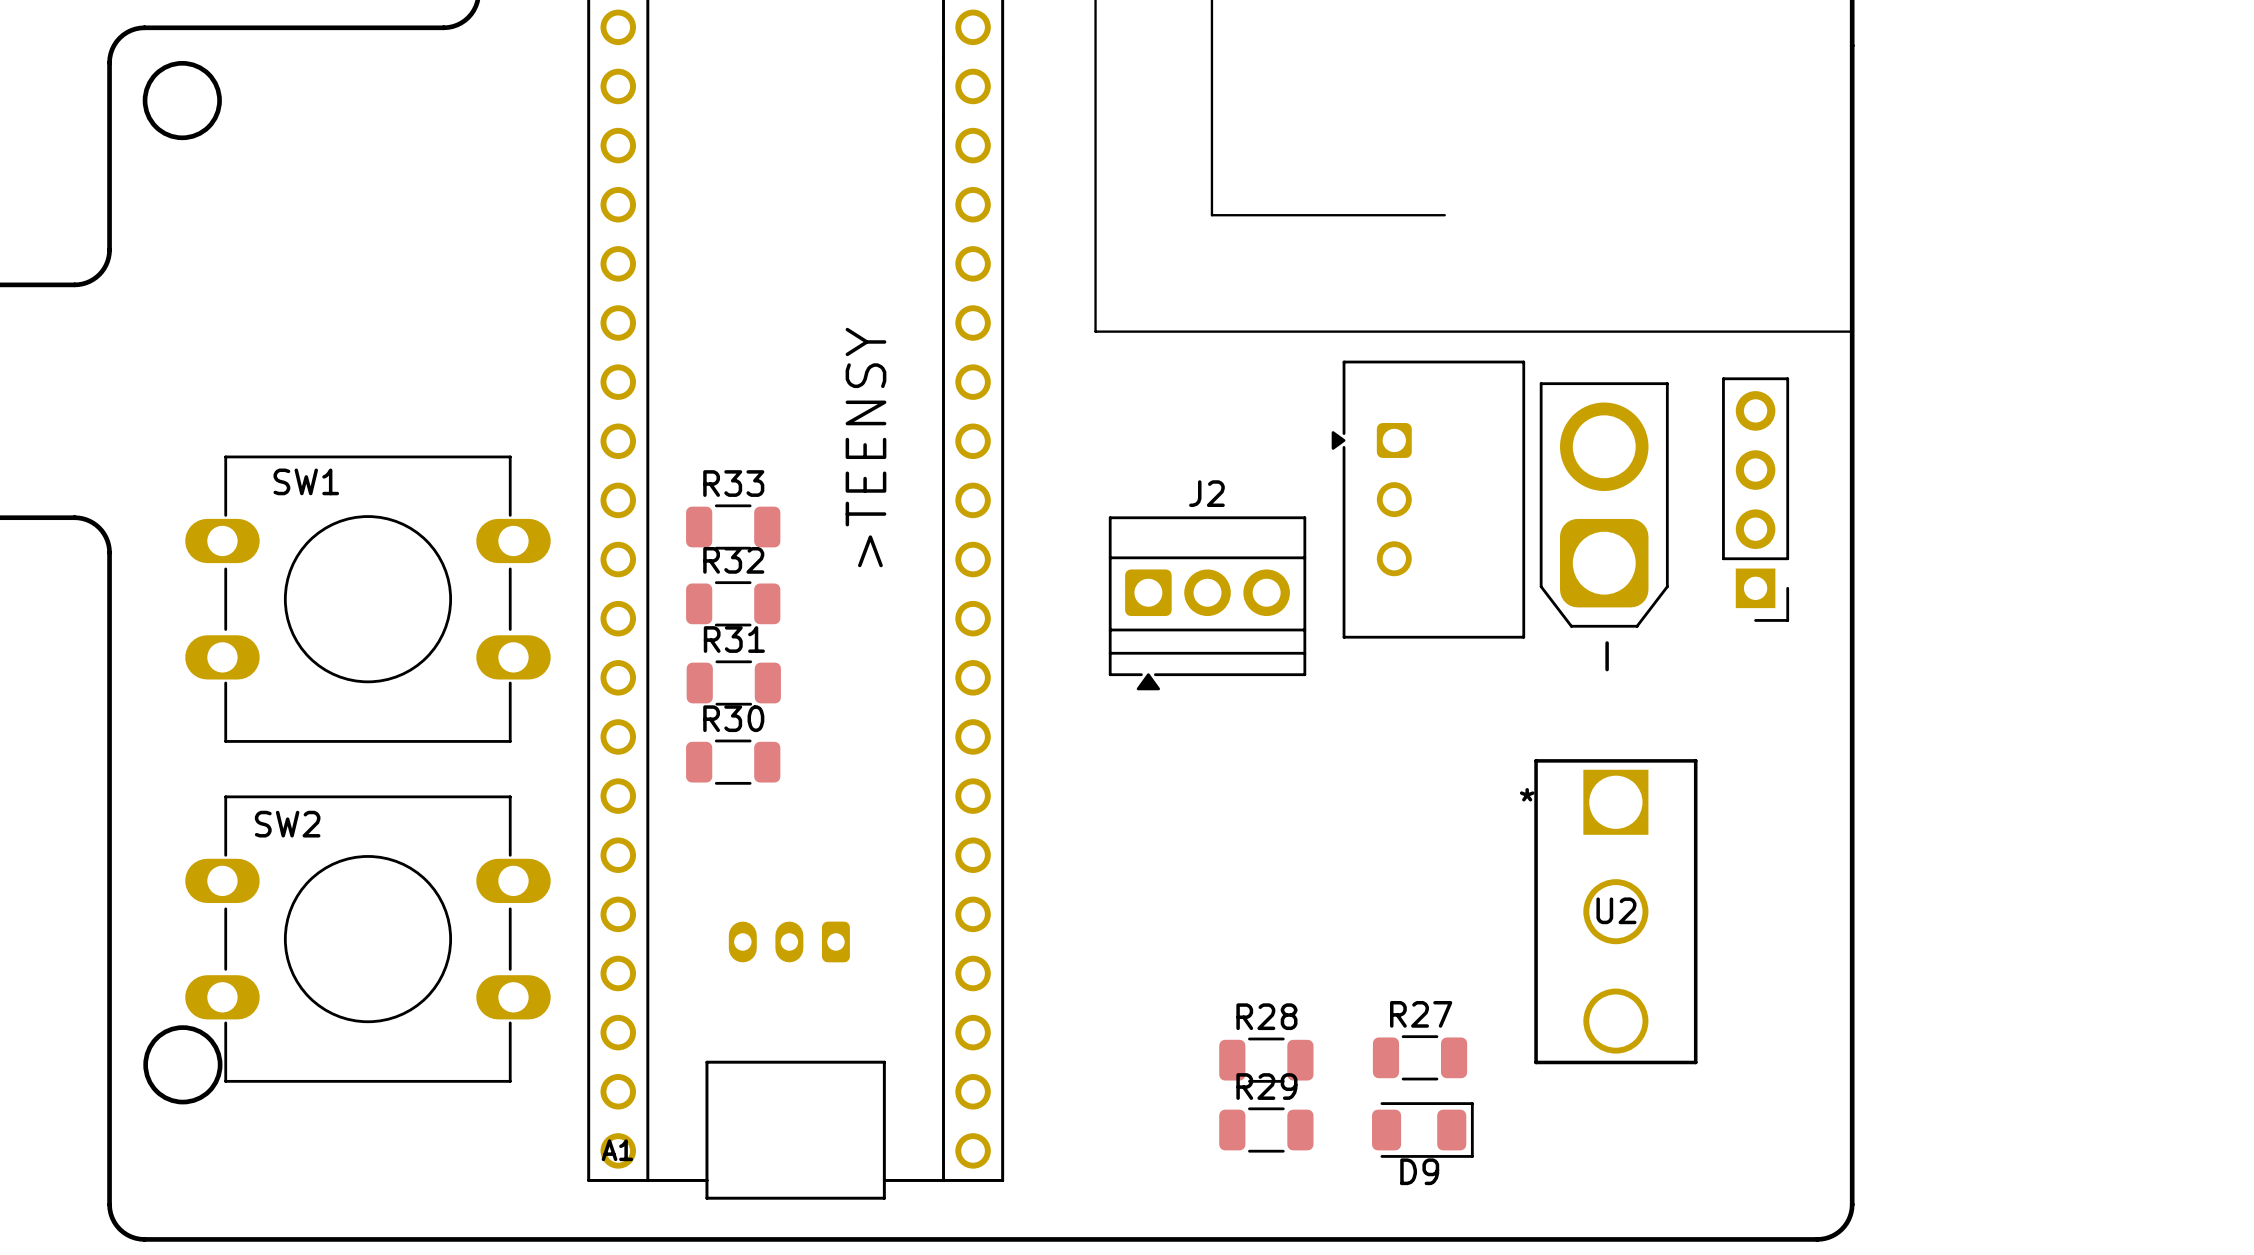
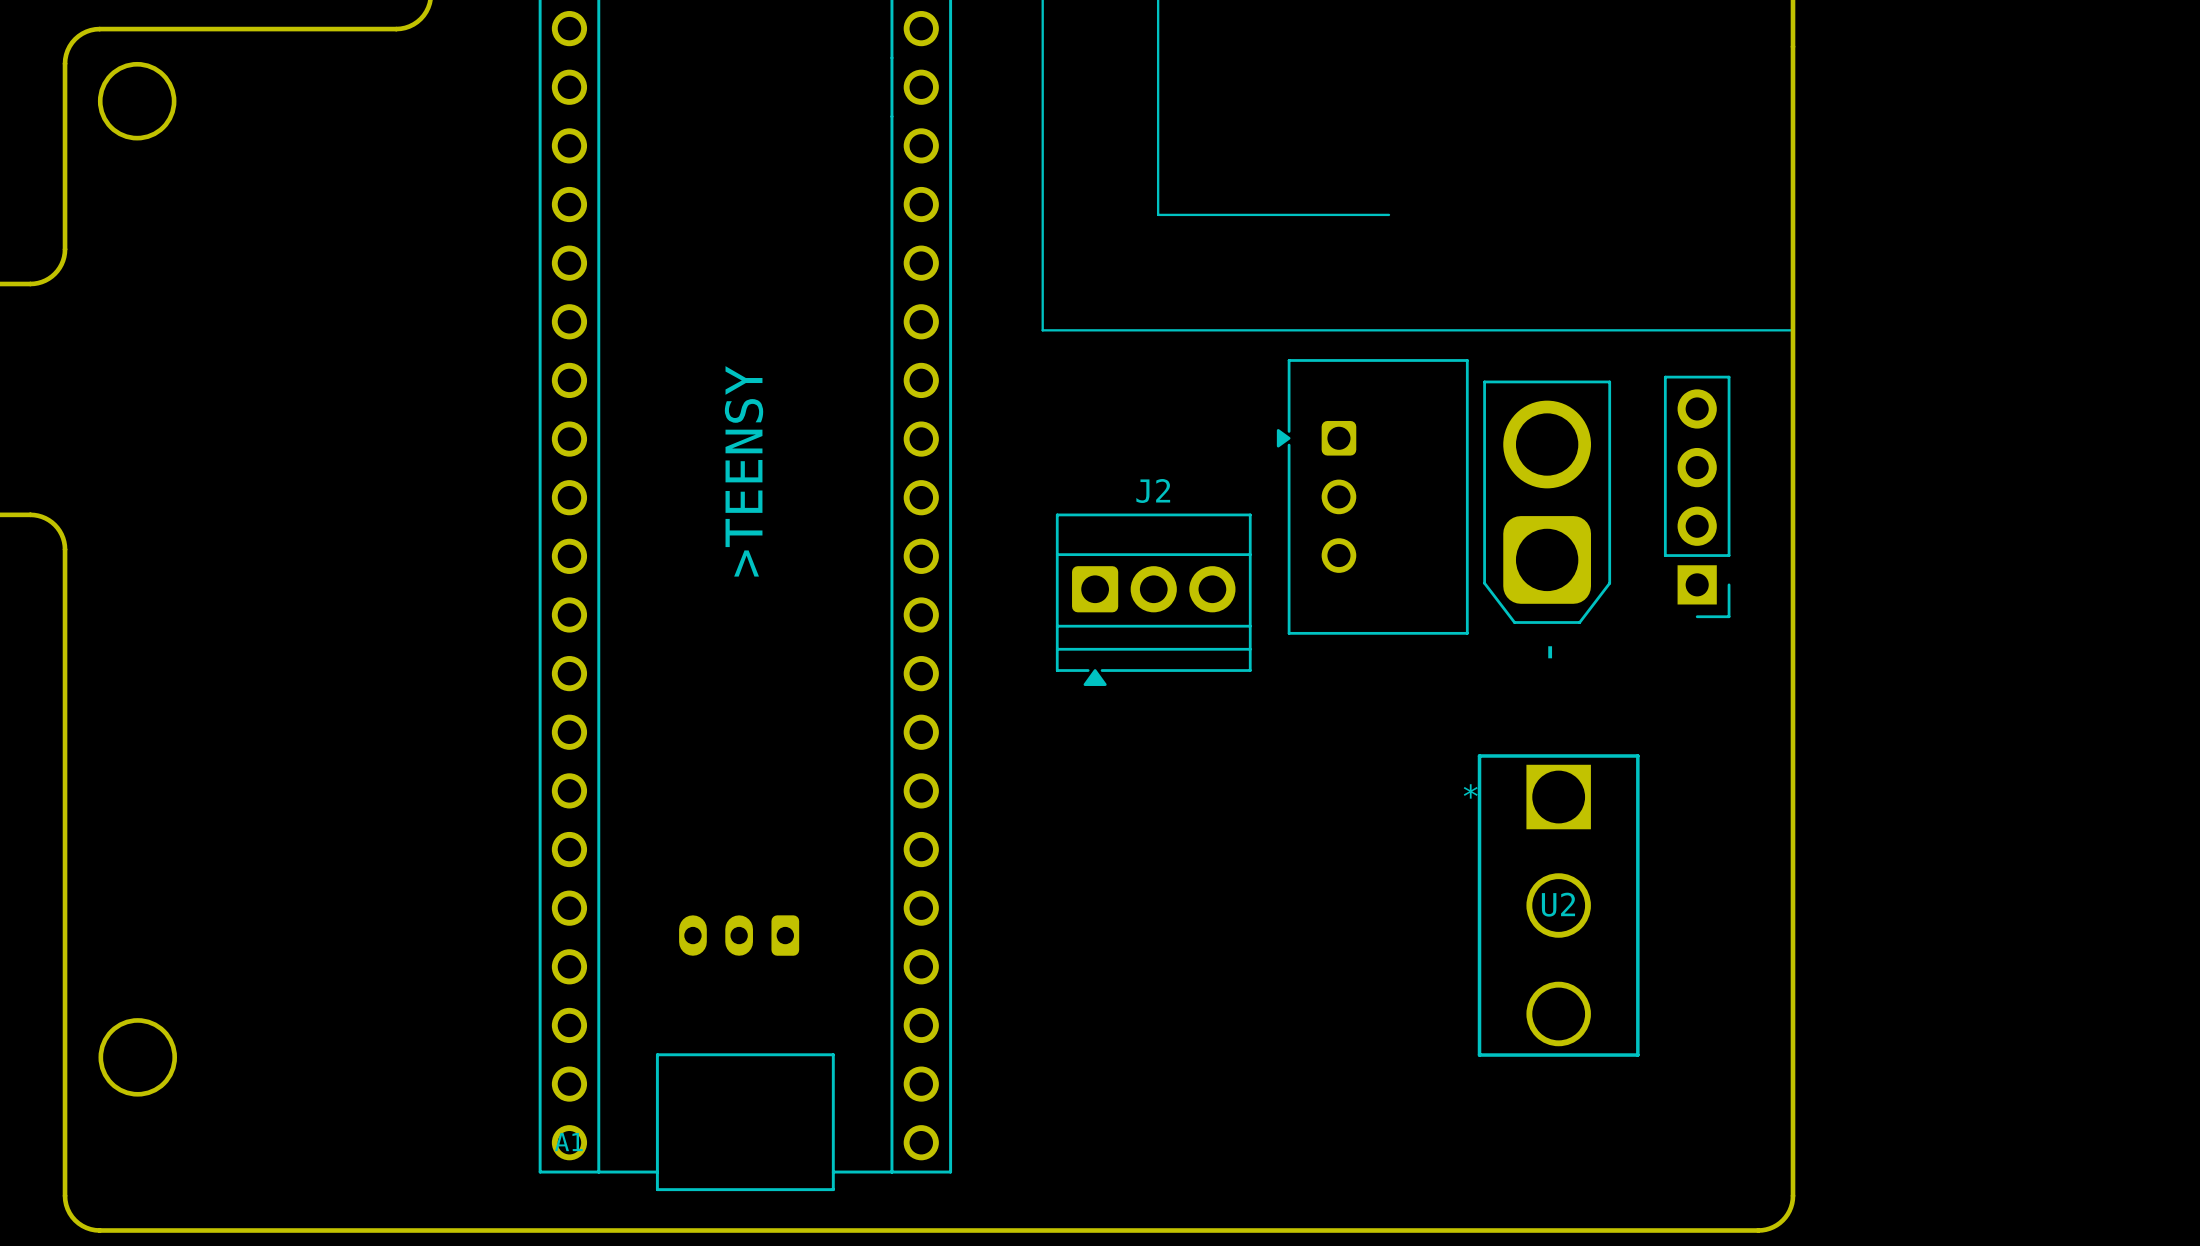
A1 text position: >TEENSY (865, 447) -> >TEENSY (744, 471)
R33: (733, 527) -> none
SW1: (367, 599) -> none
R32: (733, 603) -> none
R31: (733, 683) -> none
R30: (733, 762) -> none
SW2: (367, 939) -> none
R27: (1420, 1057) -> none
R28: (1266, 1060) -> none
R29: (1266, 1130) -> none
D9: (1422, 1130) -> none

